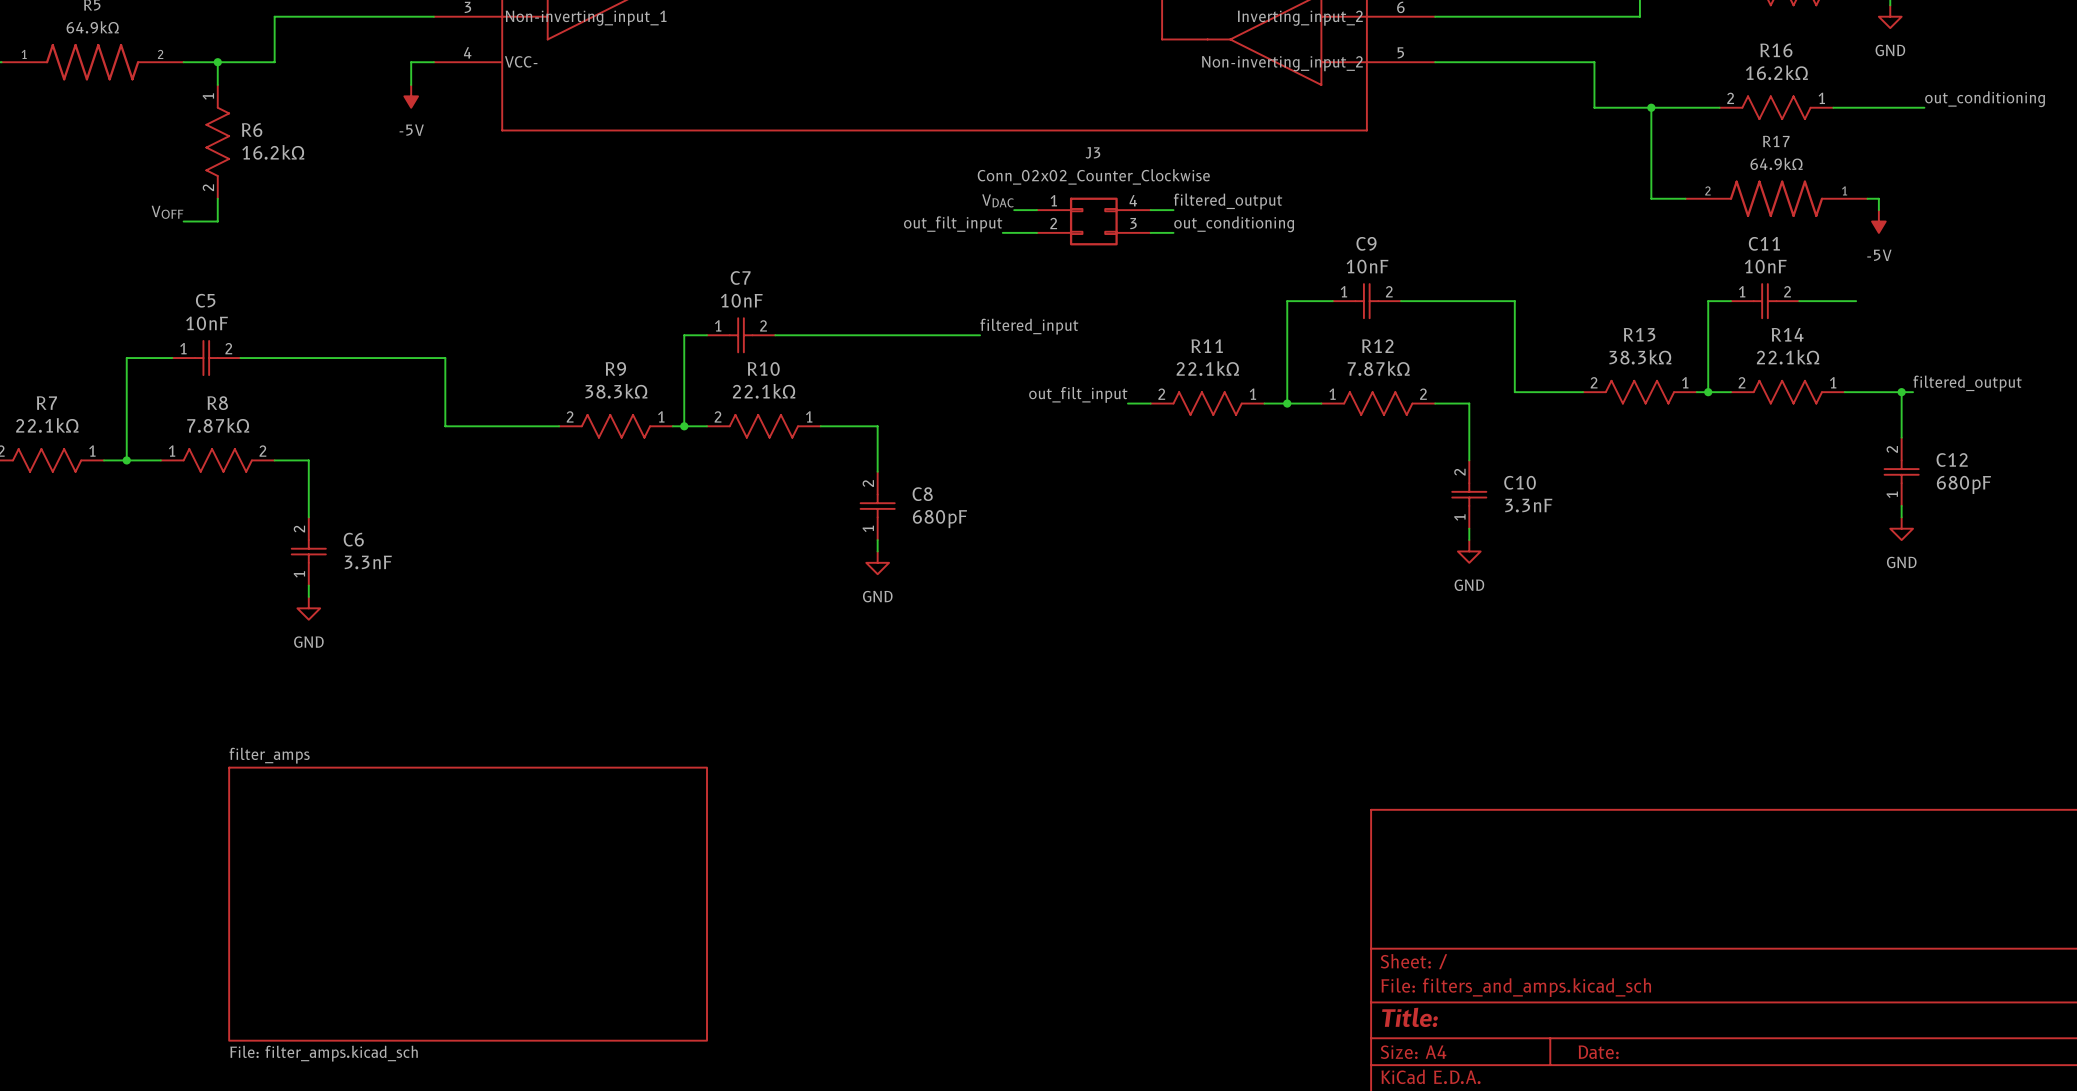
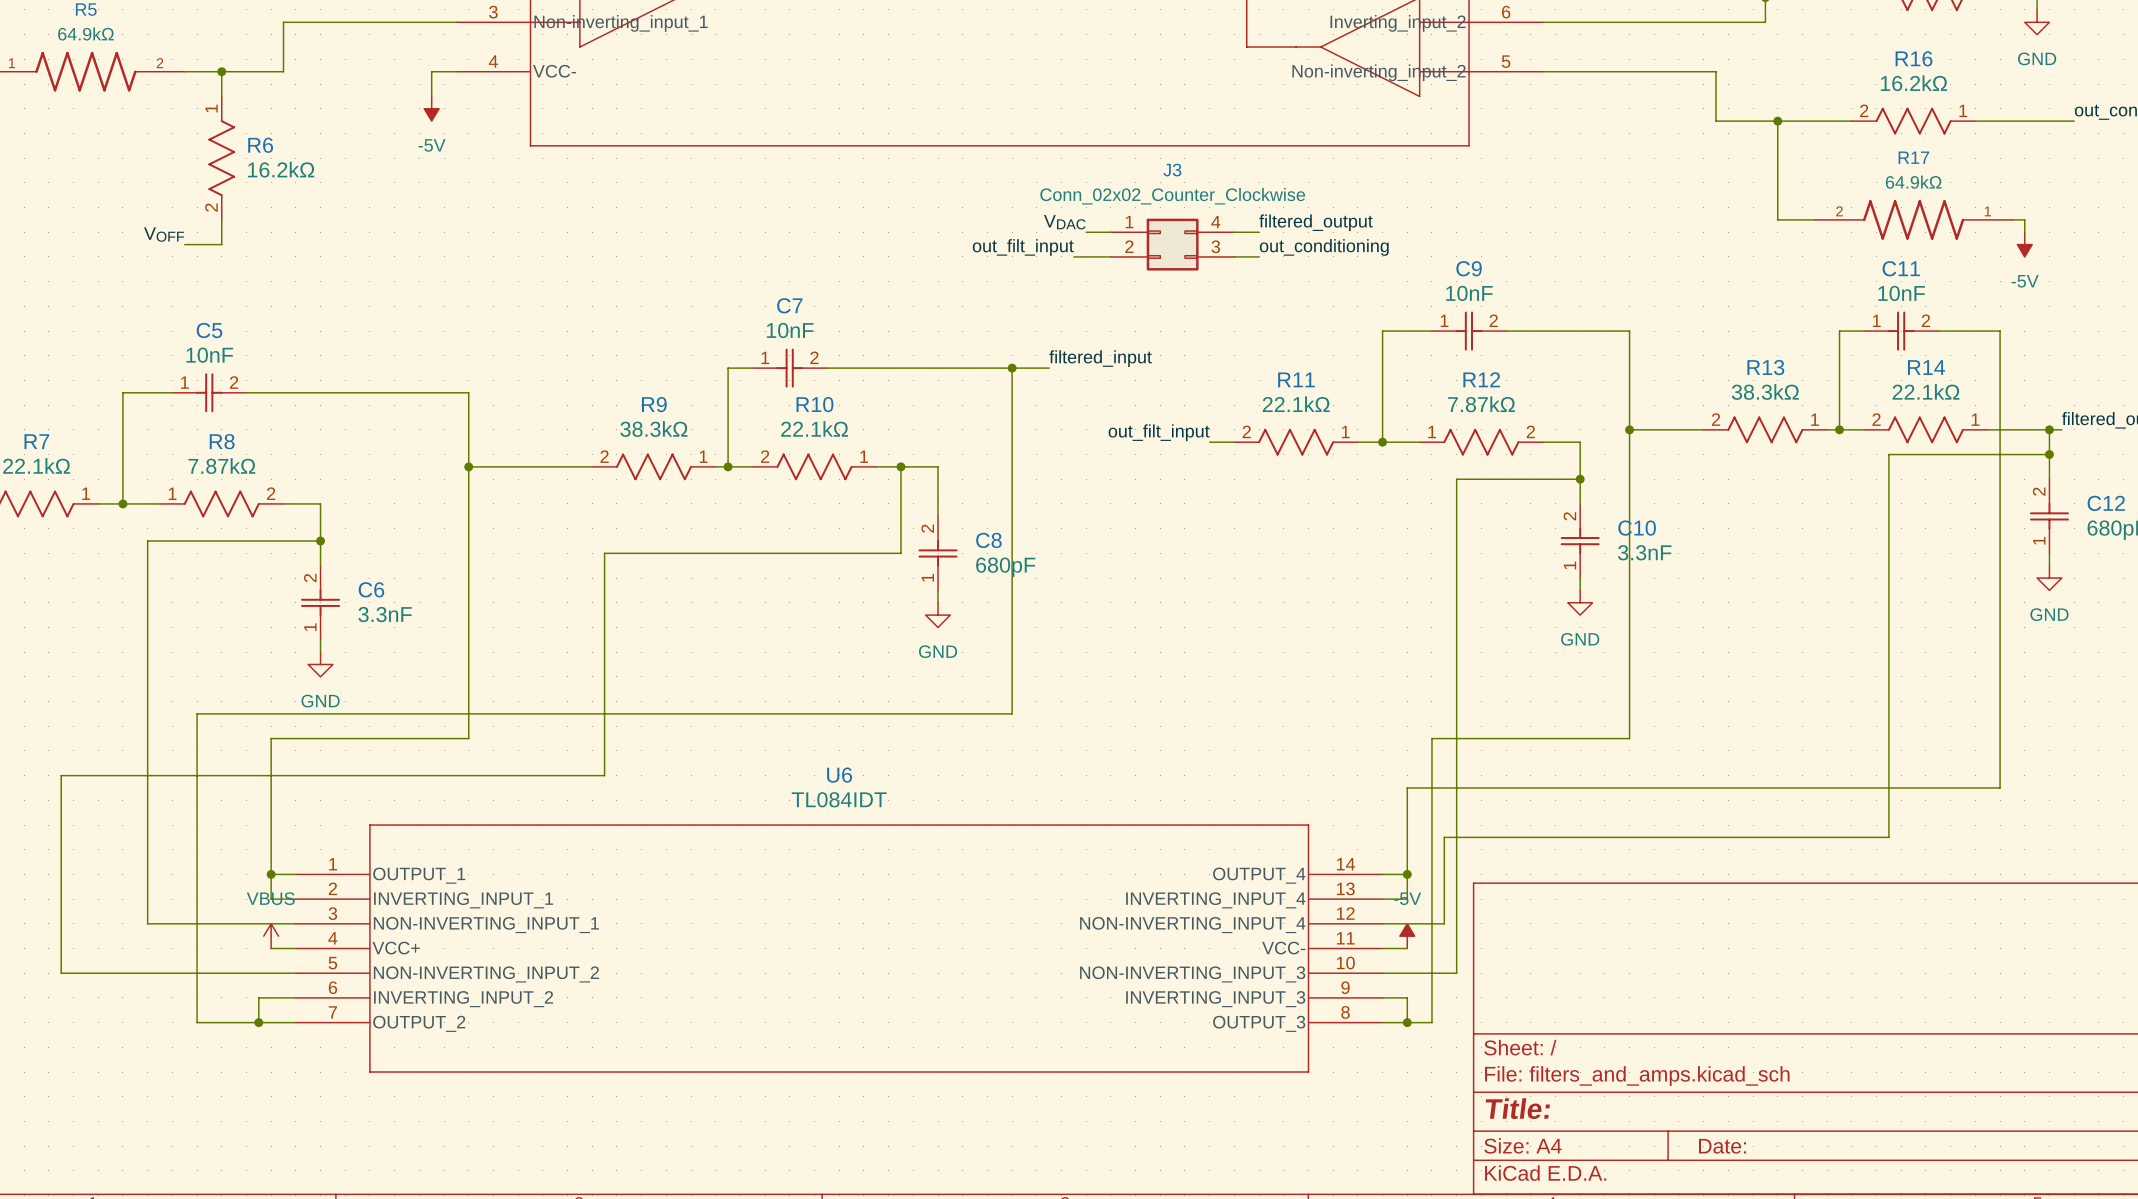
wire: none -> (2000, 331) (2000, 787) (1407, 787) (1407, 899) (1382, 899)
wire: none -> (1012, 368) (1012, 713) (197, 713) (197, 1022) (295, 1022)
junction: none -> (1012, 368)
wire: none -> (1629, 429) (1629, 738) (1431, 738) (1431, 1022) (1382, 1022)
junction: none -> (1629, 429)
wire: none -> (2049, 454) (1888, 454) (1888, 837) (1444, 837) (1444, 923) (1382, 923)
junction: none -> (2049, 454)
wire: none -> (468, 466) (468, 738) (271, 738) (271, 899) (295, 899)
junction: none -> (468, 466)
wire: none -> (900, 466) (900, 553) (604, 553) (604, 775) (61, 775) (61, 973) (295, 973)
junction: none -> (900, 466)
wire: none -> (1580, 479) (1456, 479) (1456, 973) (1382, 973)
junction: none -> (1580, 479)
wire: none -> (320, 540) (147, 540) (147, 923) (295, 923)
junction: none -> (320, 540)
wire: none -> (271, 874) (295, 874)
junction: none -> (271, 874)
wire: none -> (1382, 874) (1407, 874)
junction: none -> (1407, 874)
power symbol: none -> VBUS (271, 936)
power symbol: none -> -5V (1407, 936)
wire: none -> (271, 948) (295, 948)
U6: none -> TL084IDT (839, 948)
wire: none -> (1382, 948) (1407, 948)
sheet filter_amps: File: filter_amps.kicad_sch (468, 904) -> none
wire: none -> (295, 997) (258, 997) (258, 1022)
wire: none -> (1382, 997) (1407, 997) (1407, 1022)
junction: none -> (258, 1022)
junction: none -> (1407, 1022)

